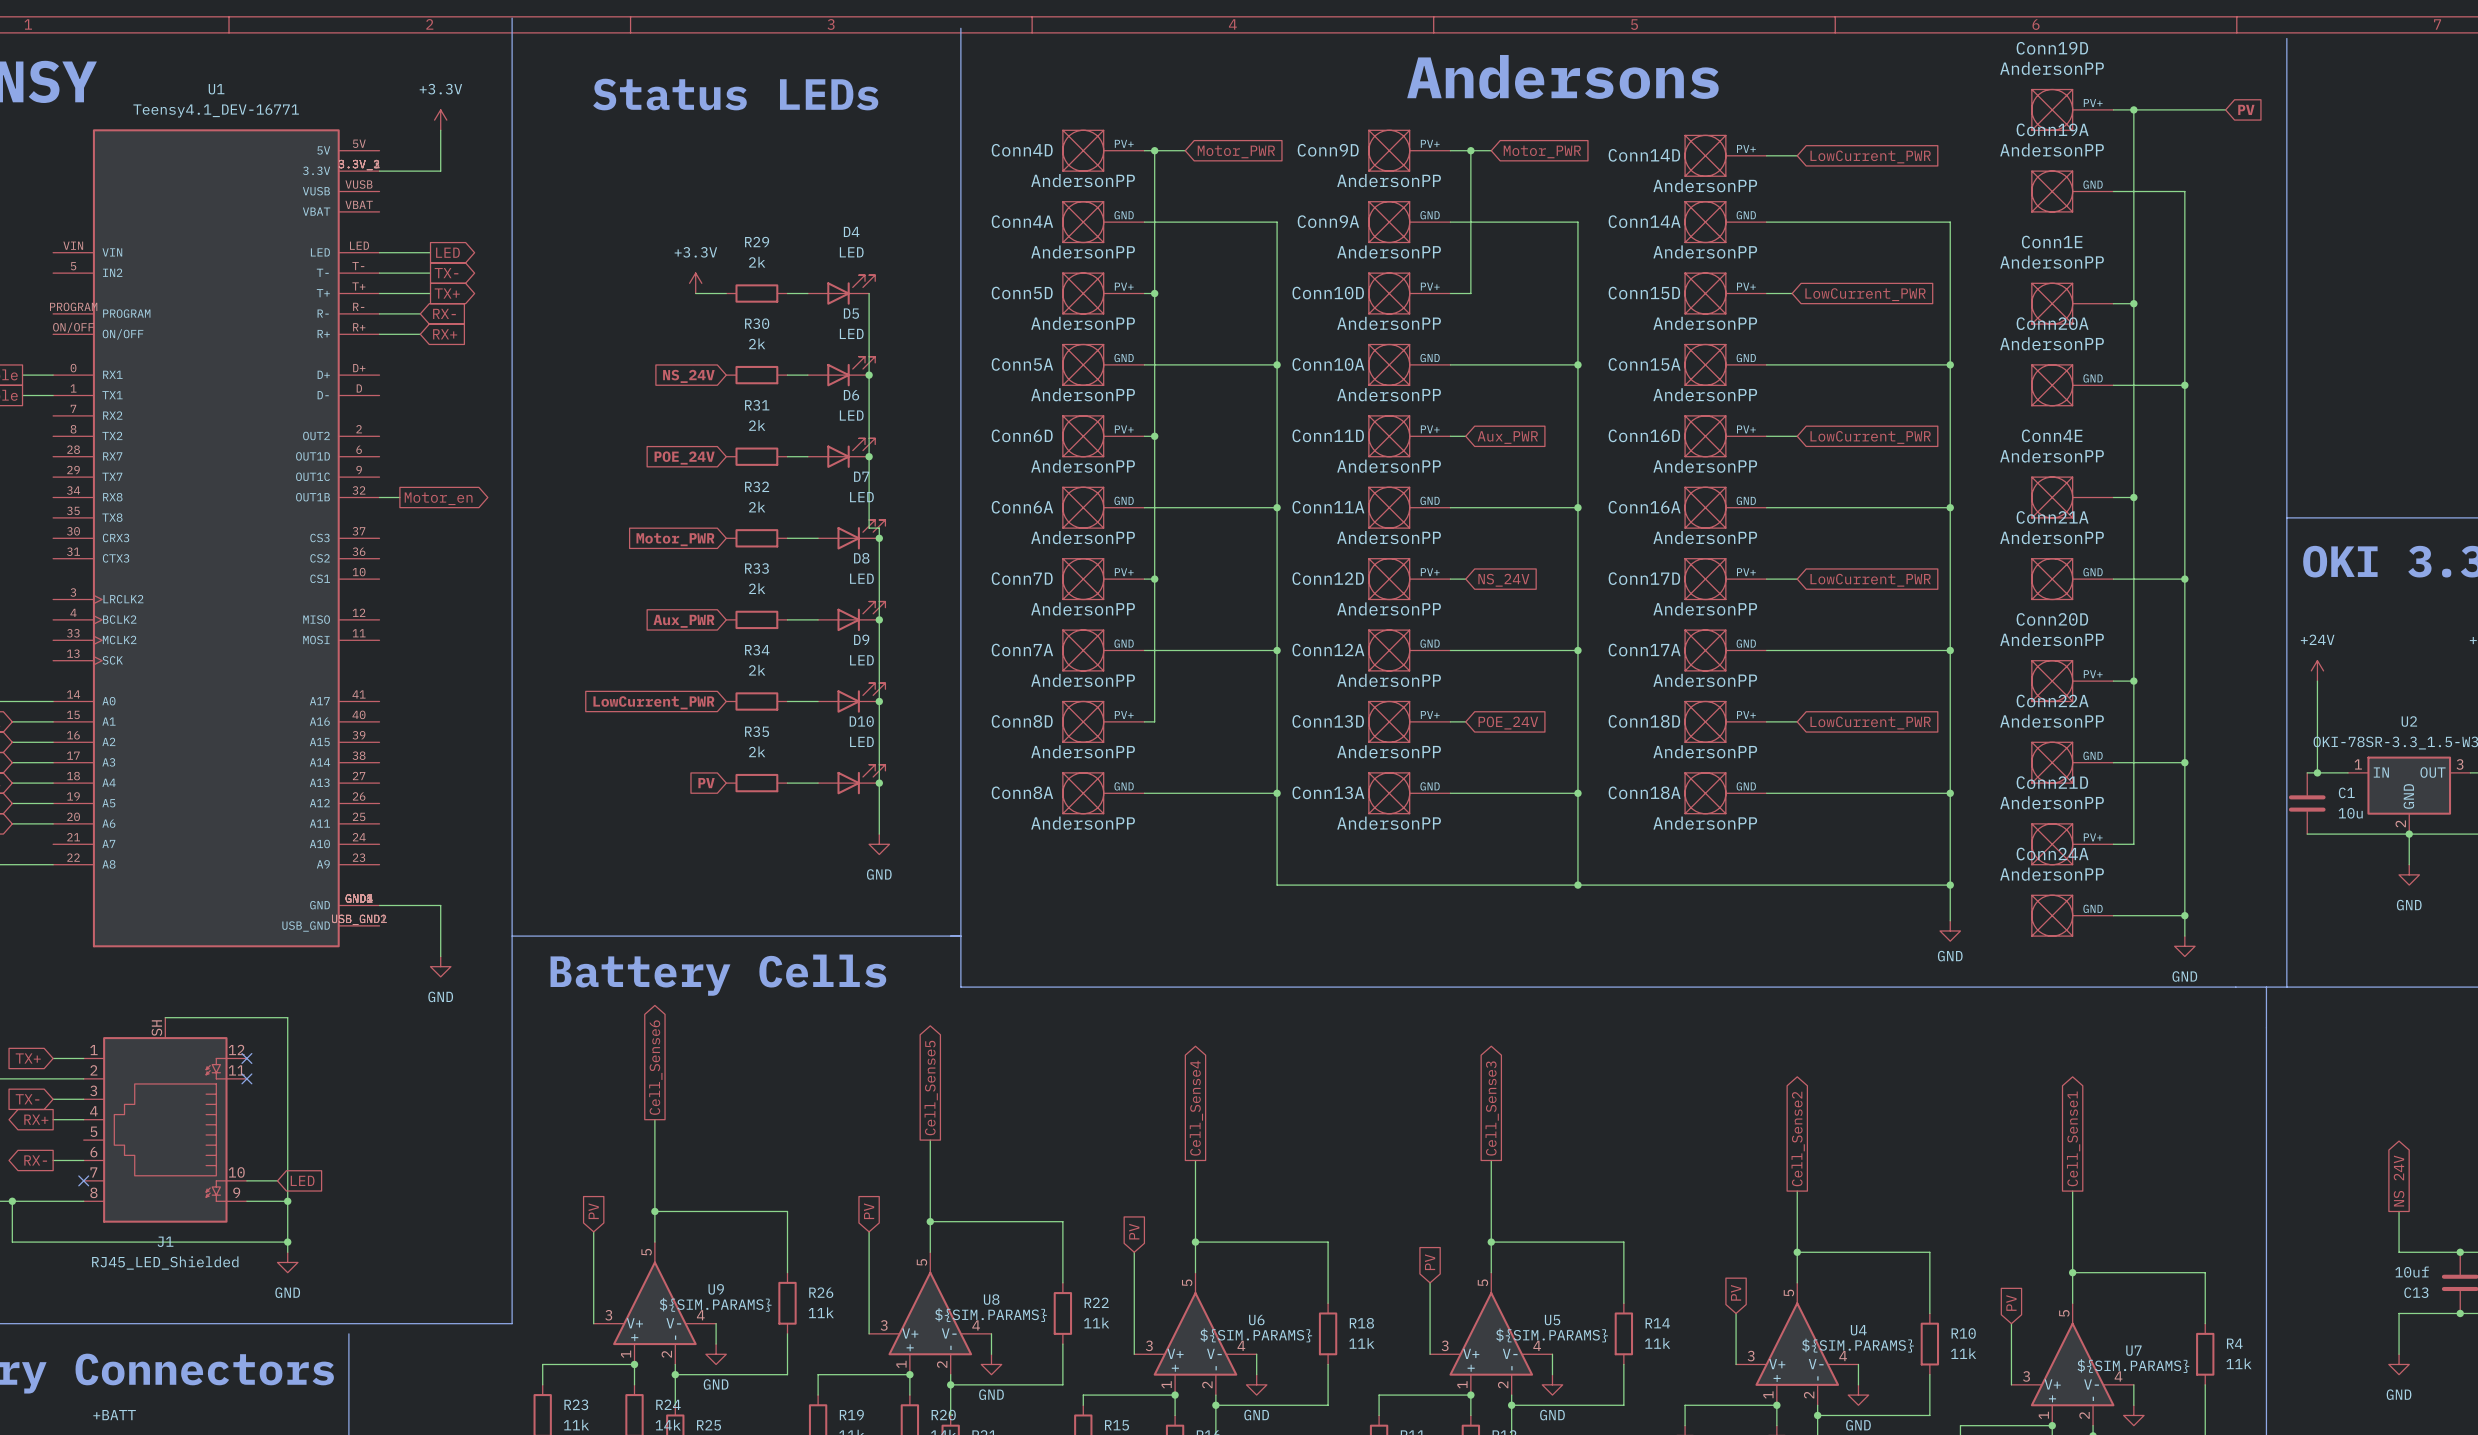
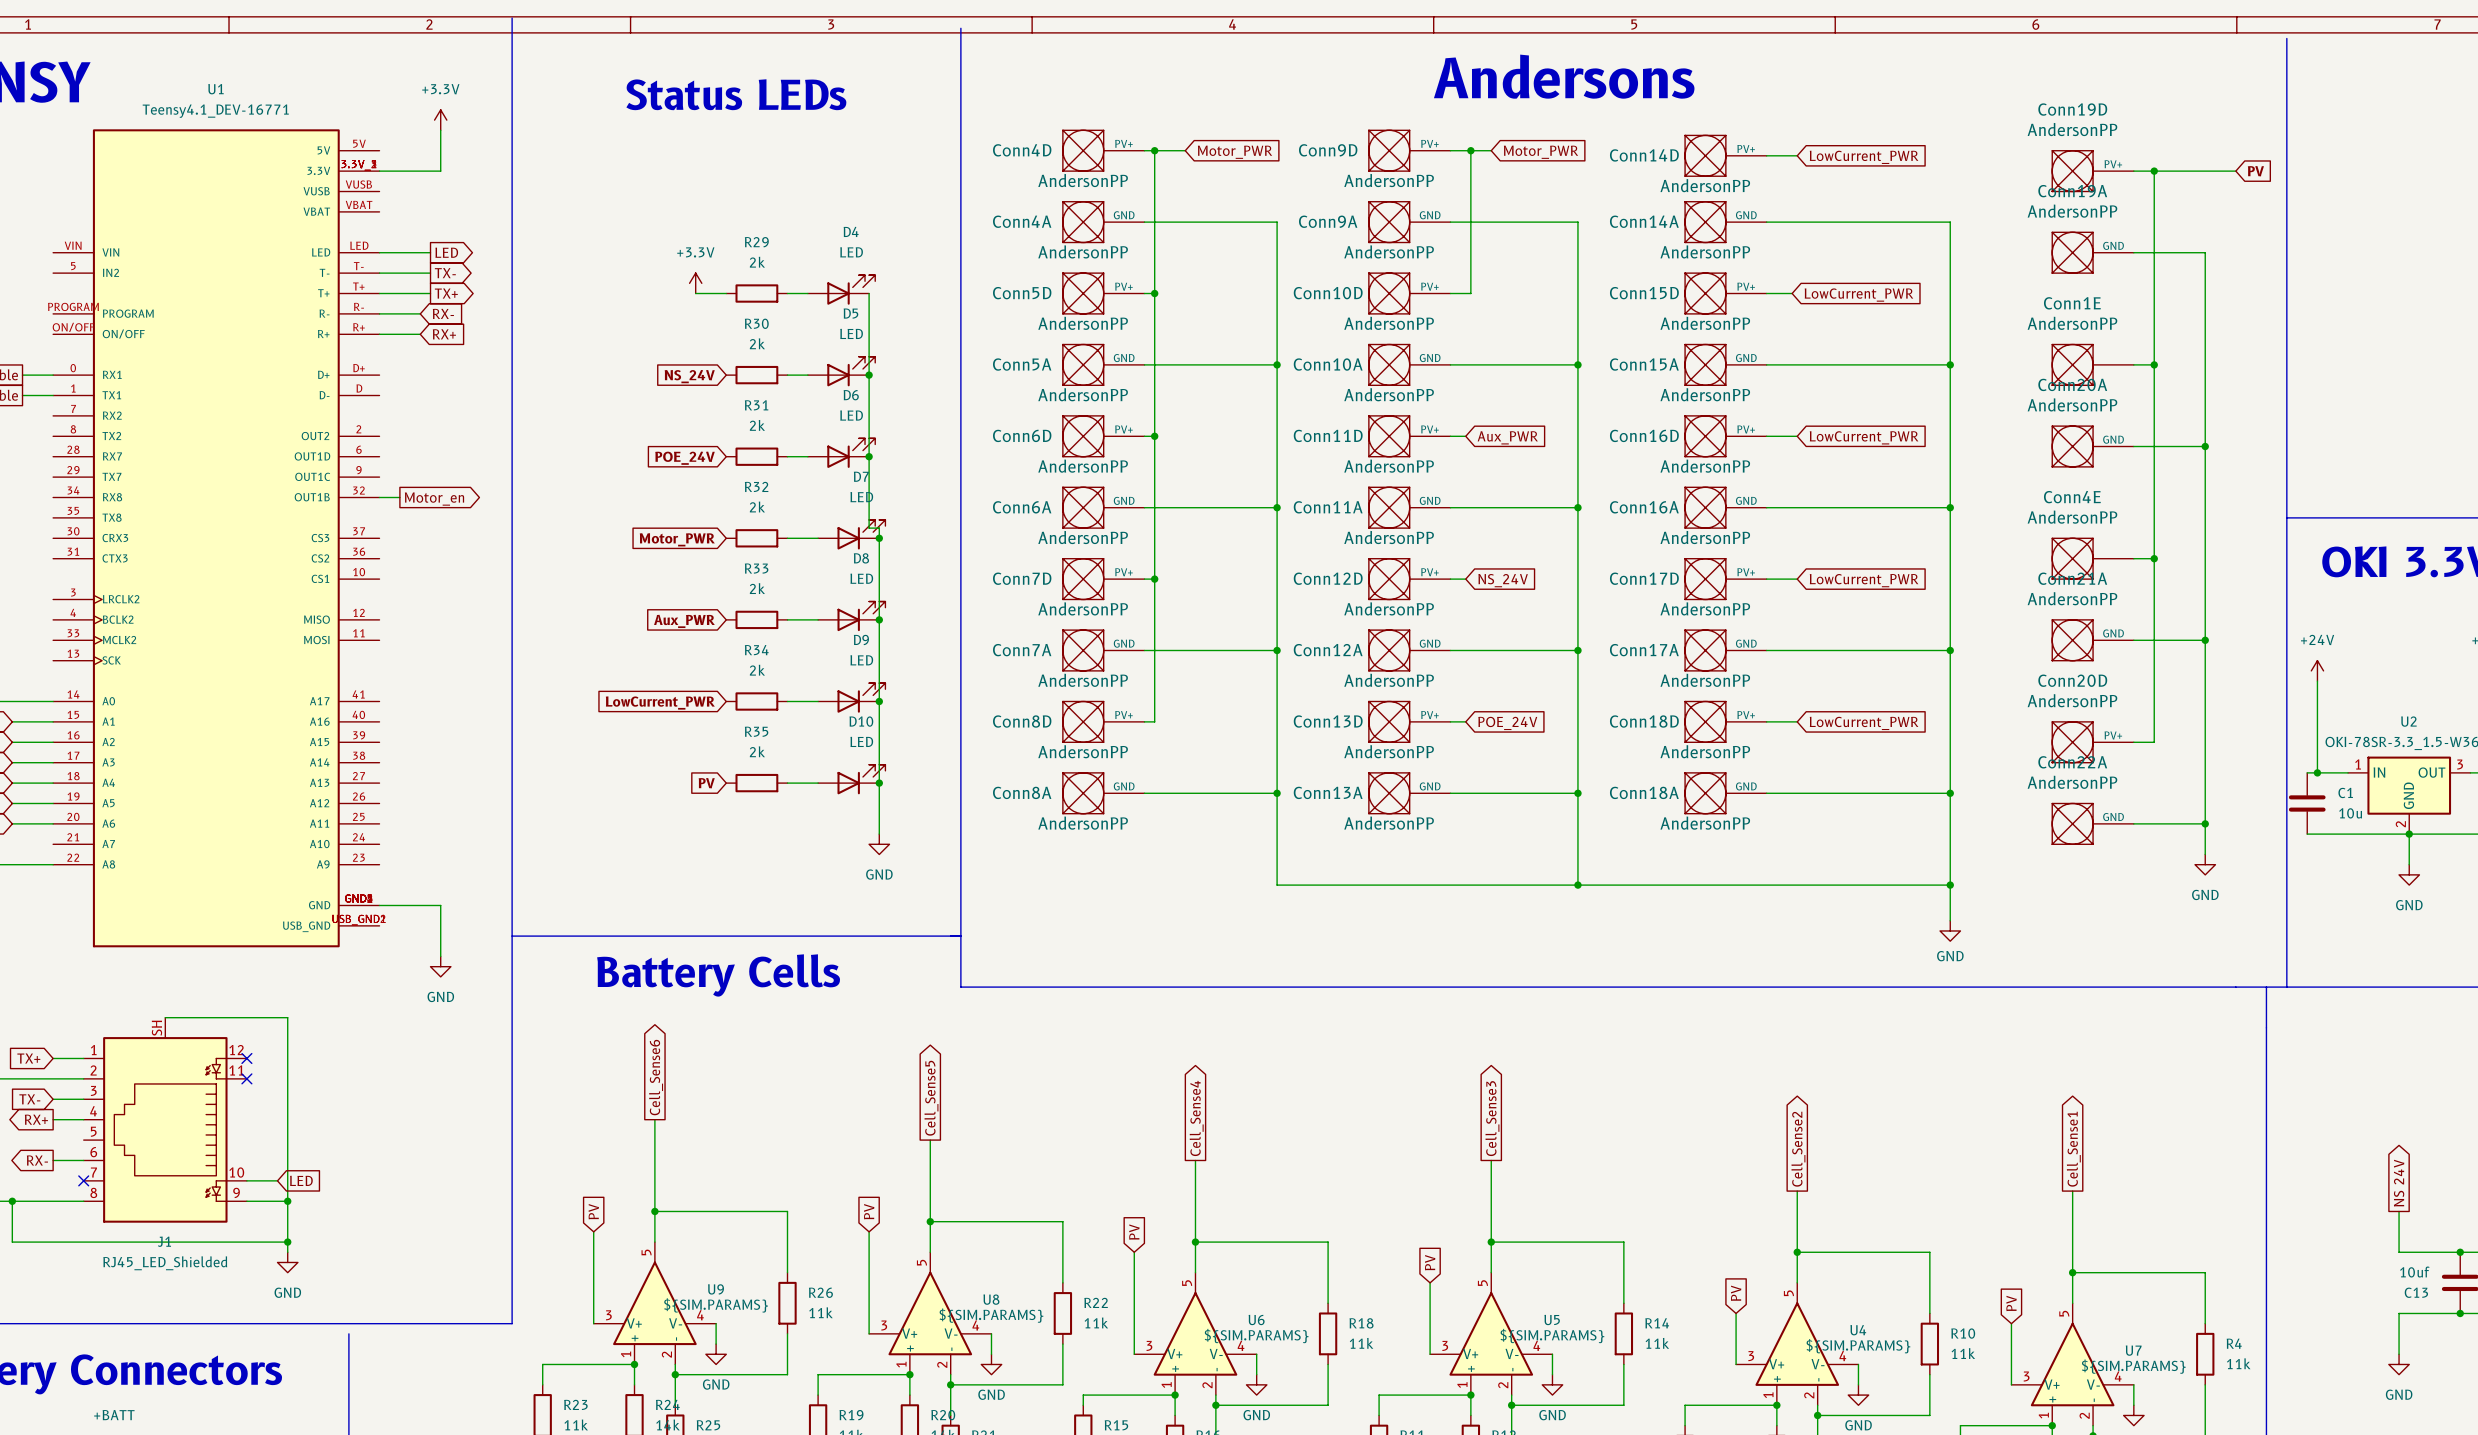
Conn19D position: (2072, 109) -> (2093, 171)
wire: (2113, 109) (2225, 109) -> none
wire: (2133, 109) (2133, 844) (2113, 844) -> none
junction: (2133, 109) -> none
global label position: PV (2246, 109) -> PV (2255, 171)
wire: none -> (2133, 171) (2235, 171)
wire: none -> (2154, 171) (2154, 742) (2133, 742)
junction: none -> (2154, 171)
Conn19A position: (2072, 191) -> (2093, 252)
wire: (2113, 191) (2184, 191) (2184, 936) -> none
wire: none -> (2133, 252) (2205, 252) (2205, 854)
Conn1E position: (2072, 303) -> (2093, 364)
wire: (2113, 303) (2133, 303) -> (2133, 364) (2154, 364)
junction: (2133, 303) -> none
junction: none -> (2154, 364)
Conn20A position: (2072, 385) -> (2093, 446)
wire: (2113, 385) (2184, 385) -> (2133, 446) (2205, 446)
junction: (2184, 385) -> none
junction: none -> (2205, 446)
Conn4E position: (2072, 497) -> (2093, 558)
wire: (2113, 497) (2133, 497) -> (2133, 558) (2154, 558)
junction: (2133, 497) -> none
junction: none -> (2154, 558)
Conn21A position: (2072, 579) -> (2093, 640)
wire: (2113, 579) (2184, 579) -> (2133, 640) (2205, 640)
junction: (2184, 579) -> none
junction: none -> (2205, 640)
Conn20D position: (2072, 681) -> (2093, 742)
wire: (2113, 681) (2133, 681) -> none
junction: (2133, 681) -> none
Conn22A position: (2072, 762) -> (2093, 823)
wire: (2113, 762) (2184, 762) -> (2133, 823) (2205, 823)
junction: (2184, 762) -> none
junction: none -> (2205, 823)
Conn21D: AndersonPP (2072, 844) -> none
Conn24A: AndersonPP (2072, 915) -> none
wire: (2113, 915) (2184, 915) -> none
junction: (2184, 915) -> none
power symbol position: GND (2184, 946) -> GND (2205, 864)

